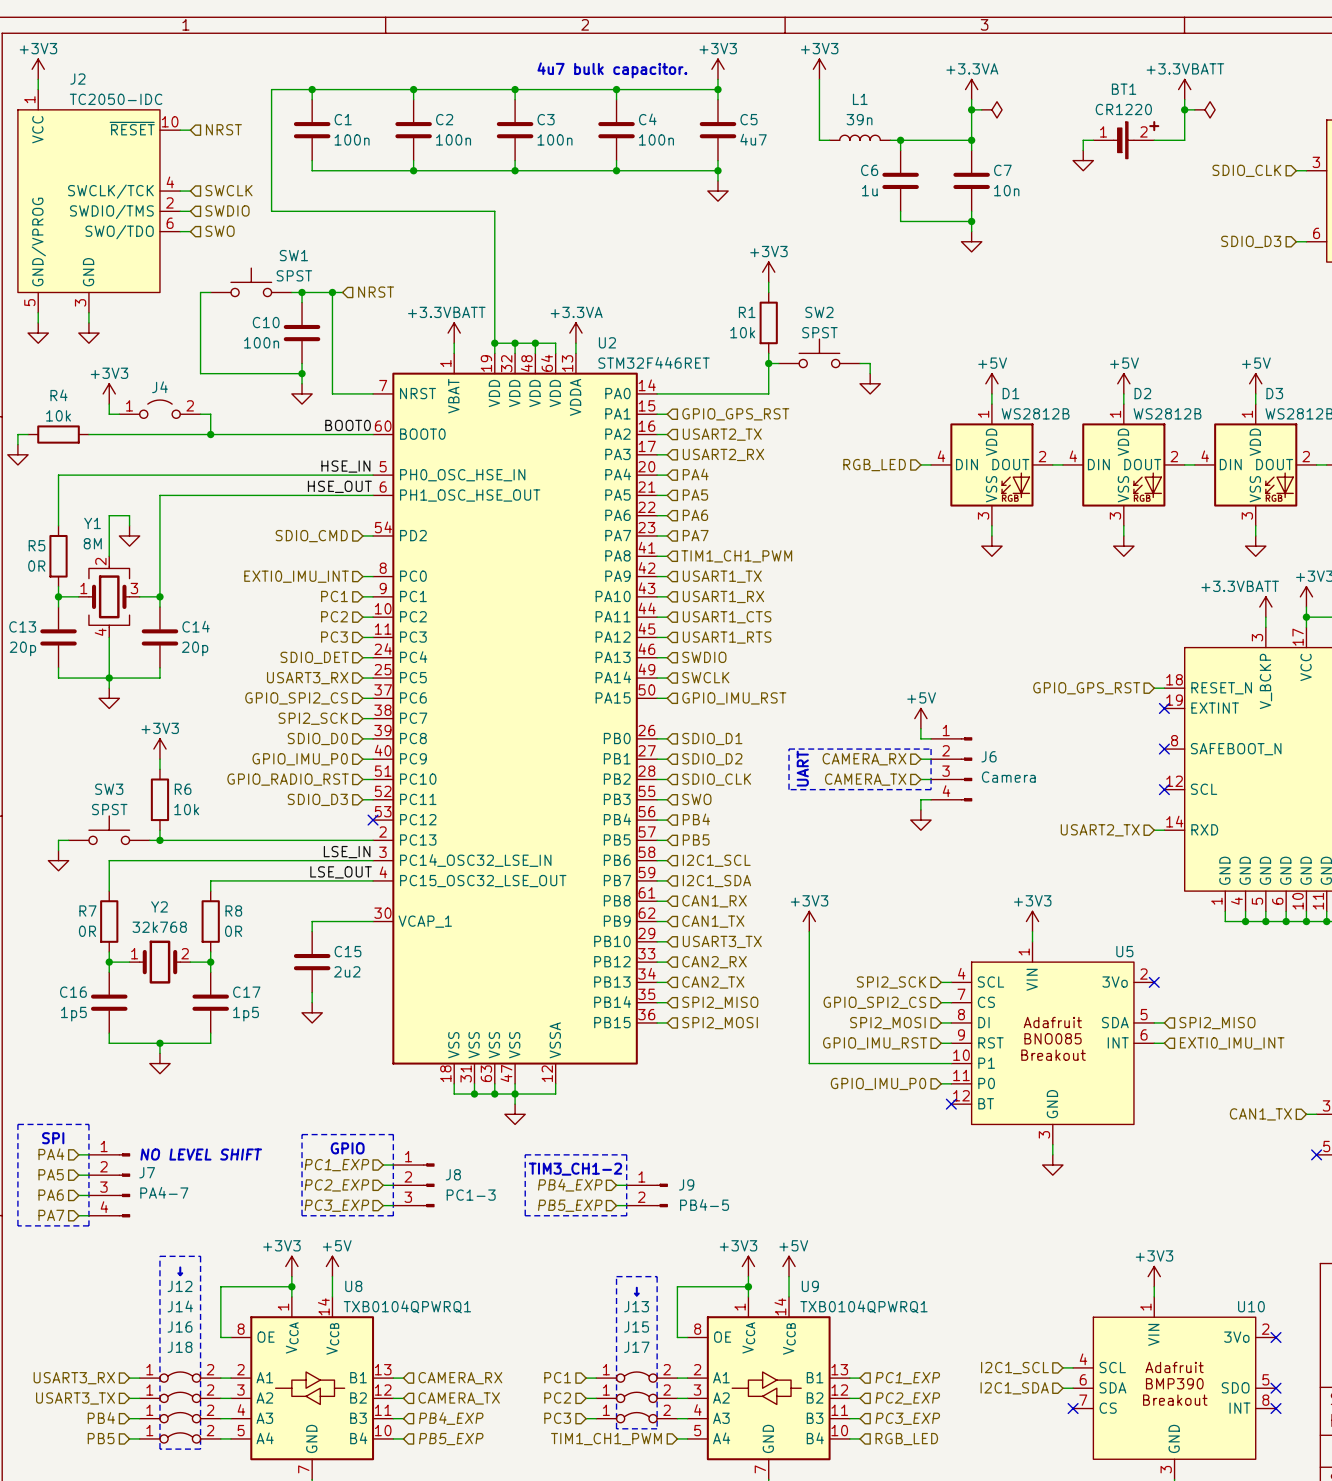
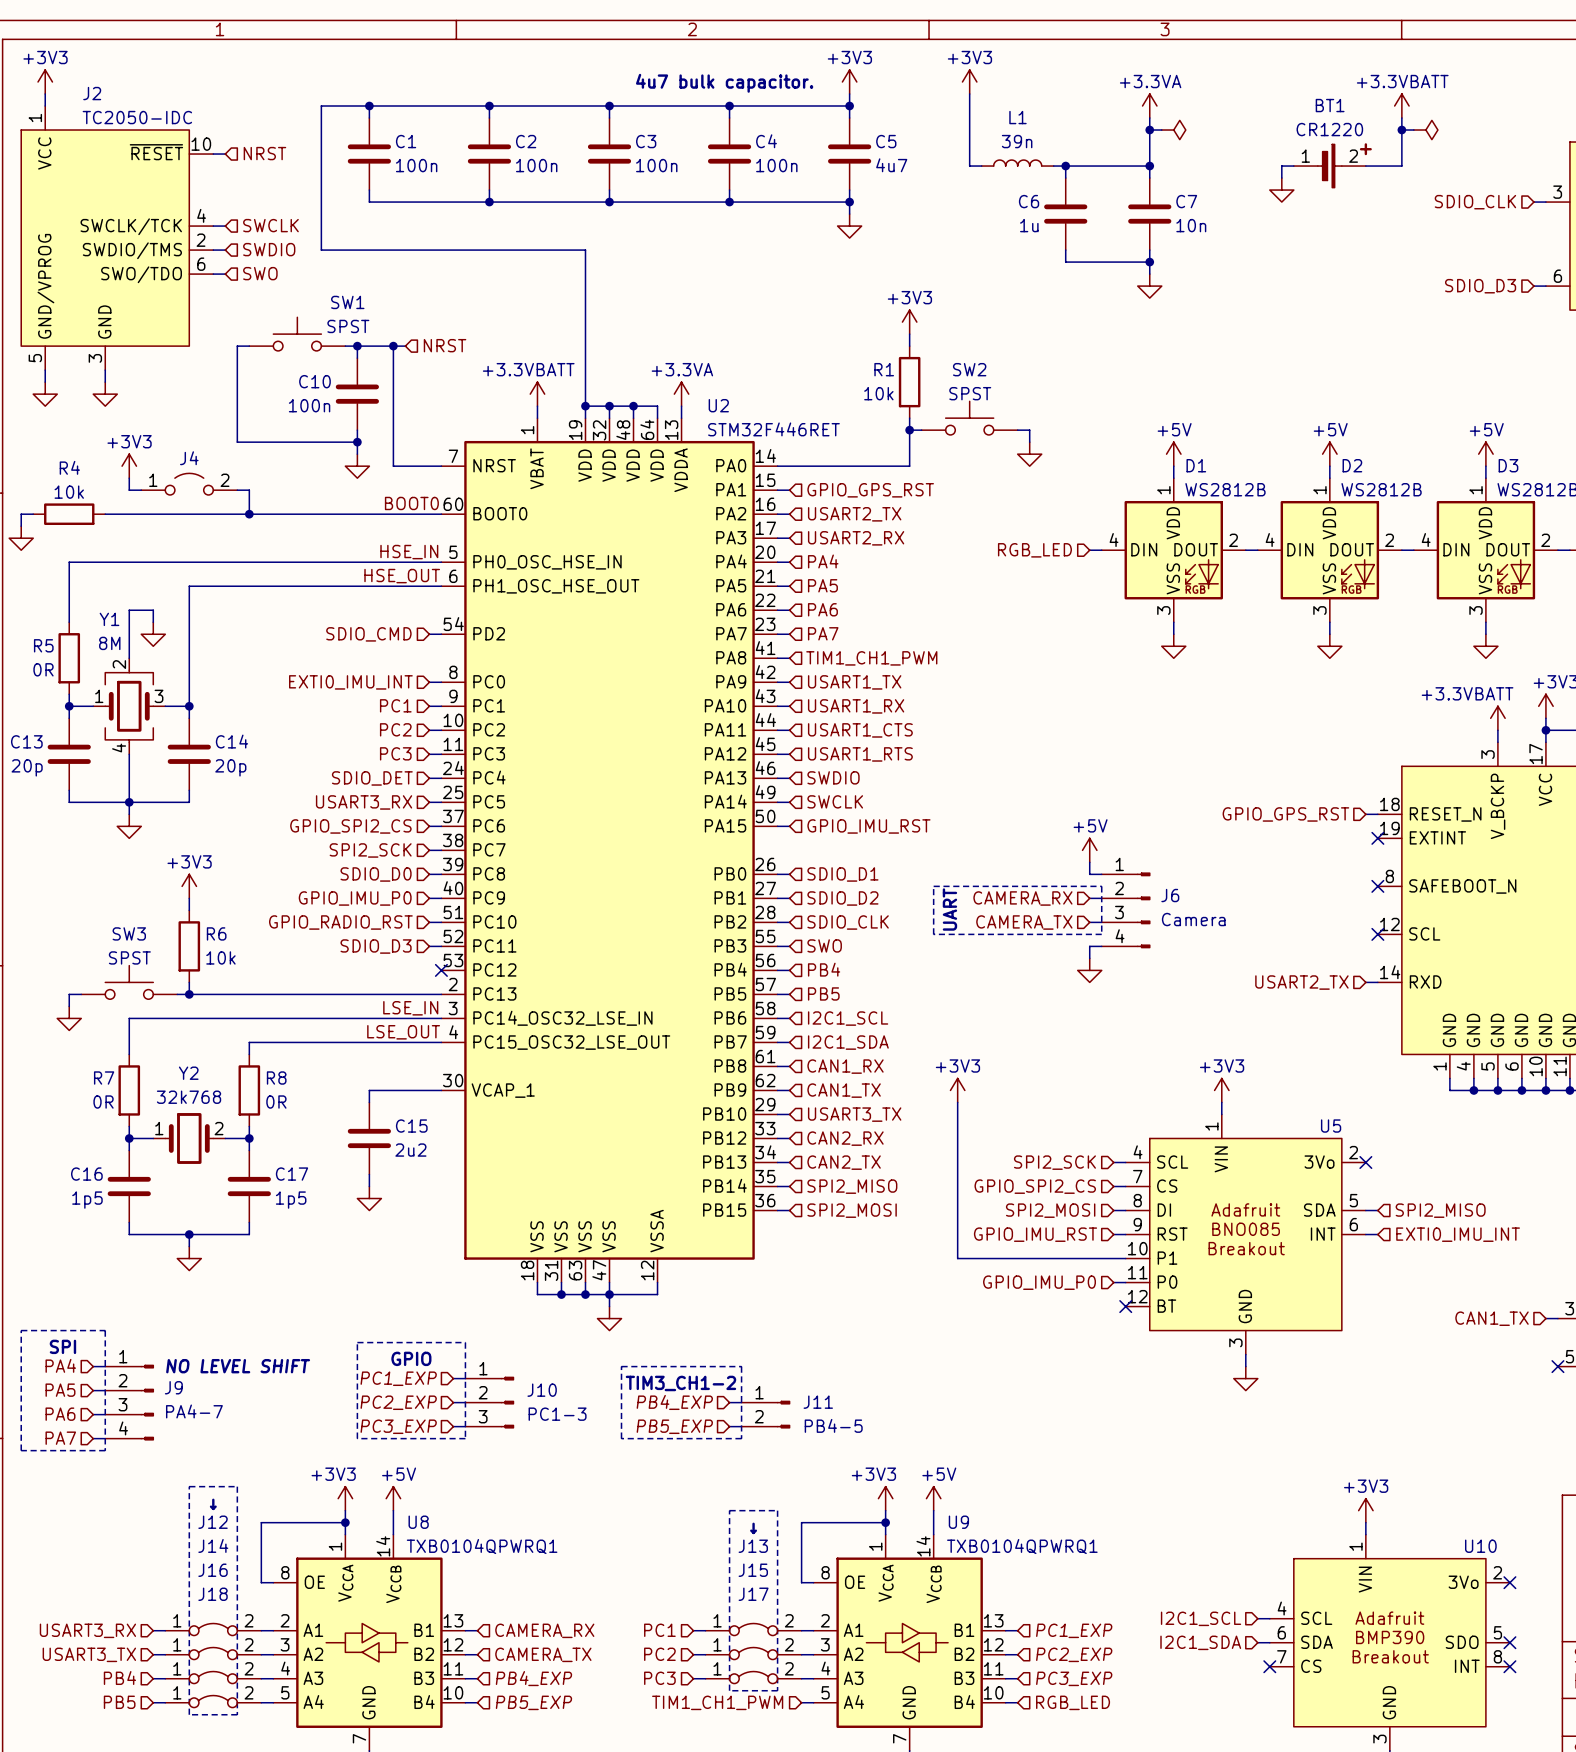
J7 name: J7 (147, 1172) -> J9 (173, 1387)
J8 name: J8 (453, 1174) -> J10 (542, 1390)
J9 name: J9 (686, 1184) -> J11 (818, 1402)

